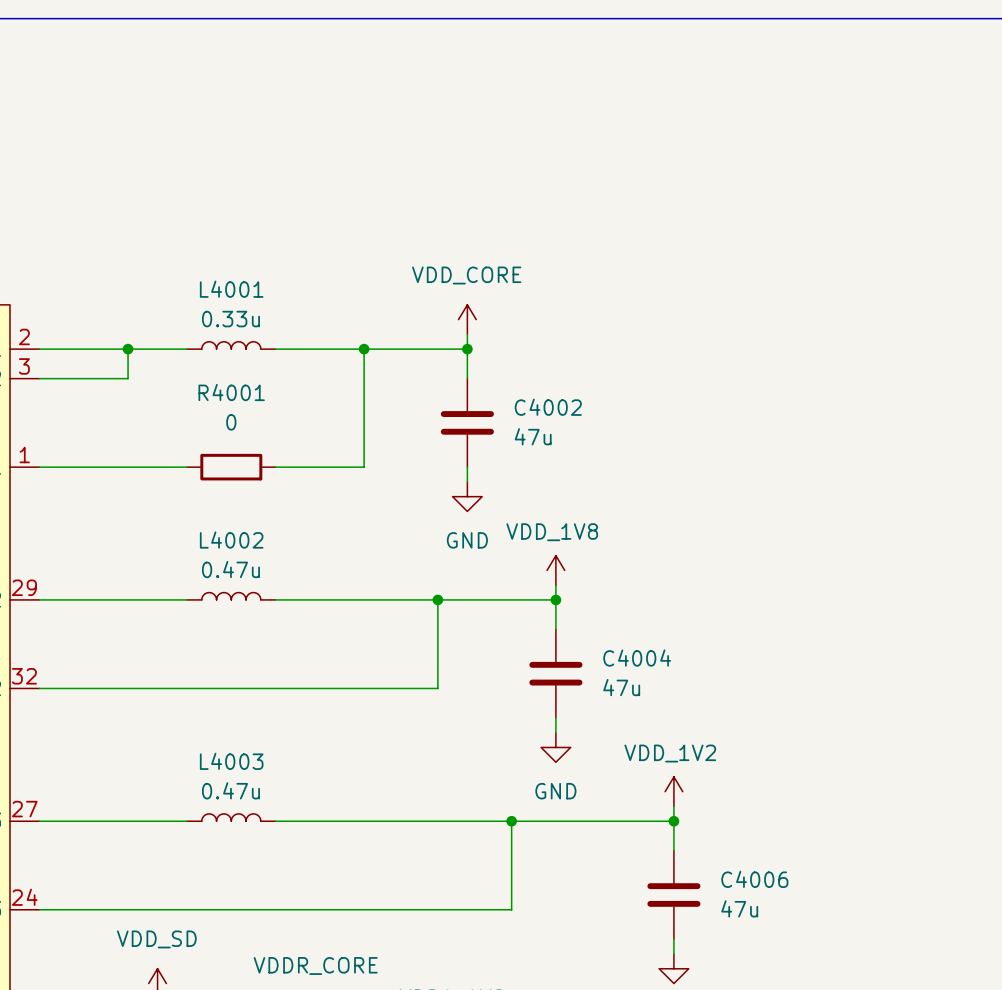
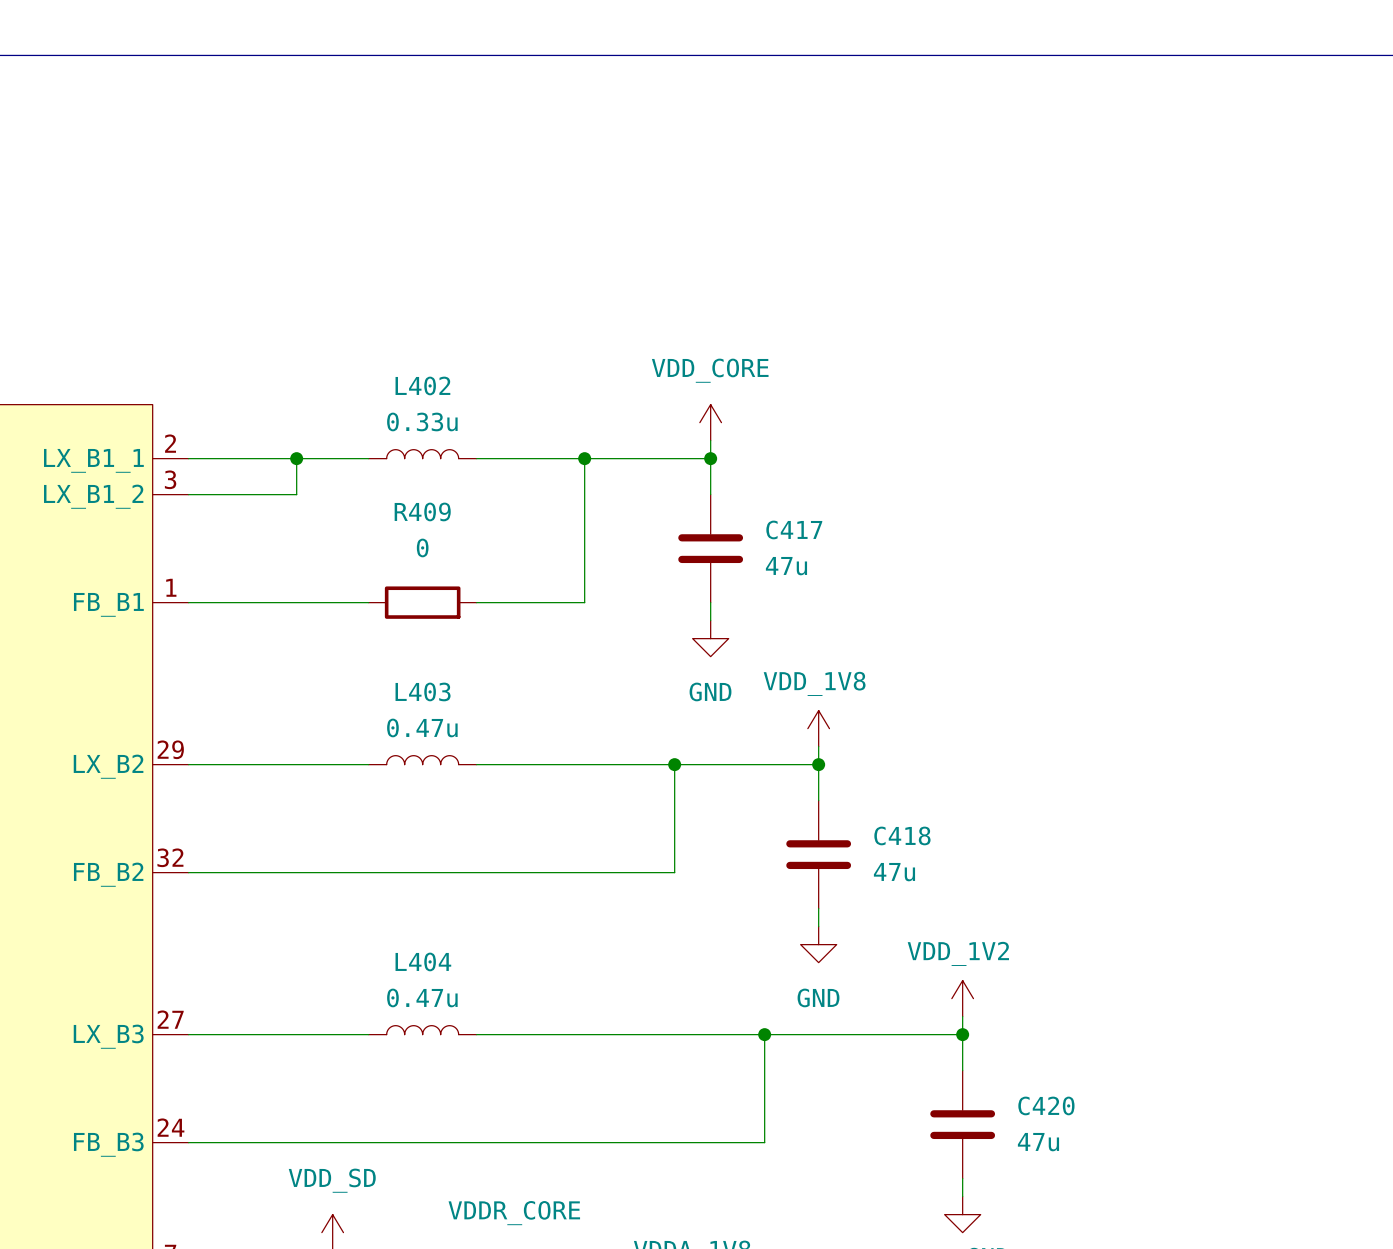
L4001 name: L4001 (231, 289) -> L402 (422, 385)
R4001 name: R4001 (231, 392) -> R409 (422, 511)
C4002 name: C4002 (548, 407) -> C417 (794, 529)
L4002 name: L4002 (231, 540) -> L403 (423, 691)
C4004 name: C4004 (637, 658) -> C418 (902, 835)
L4003 name: L4003 (231, 761) -> L404 (423, 961)
C4006 name: C4006 (754, 879) -> C420 (1046, 1105)

